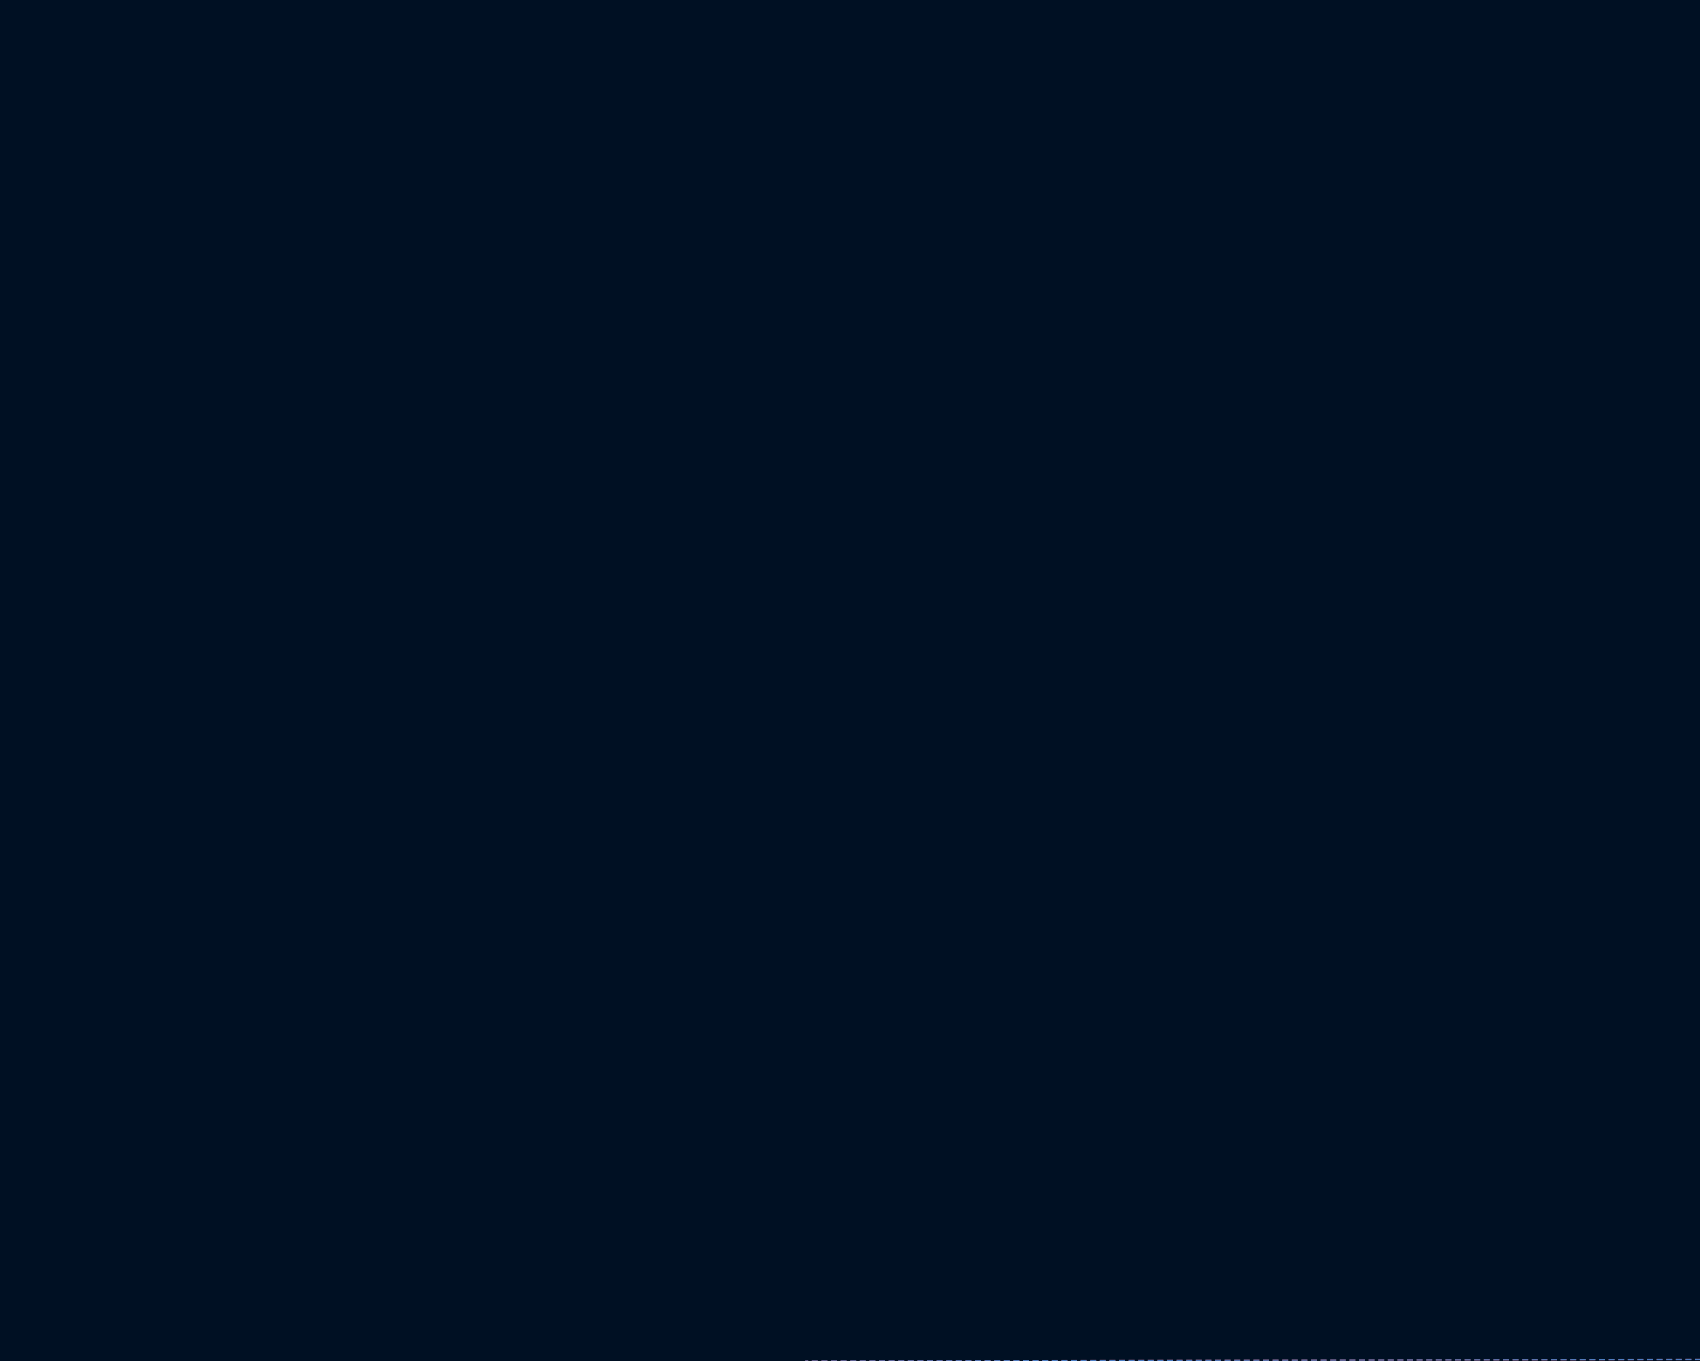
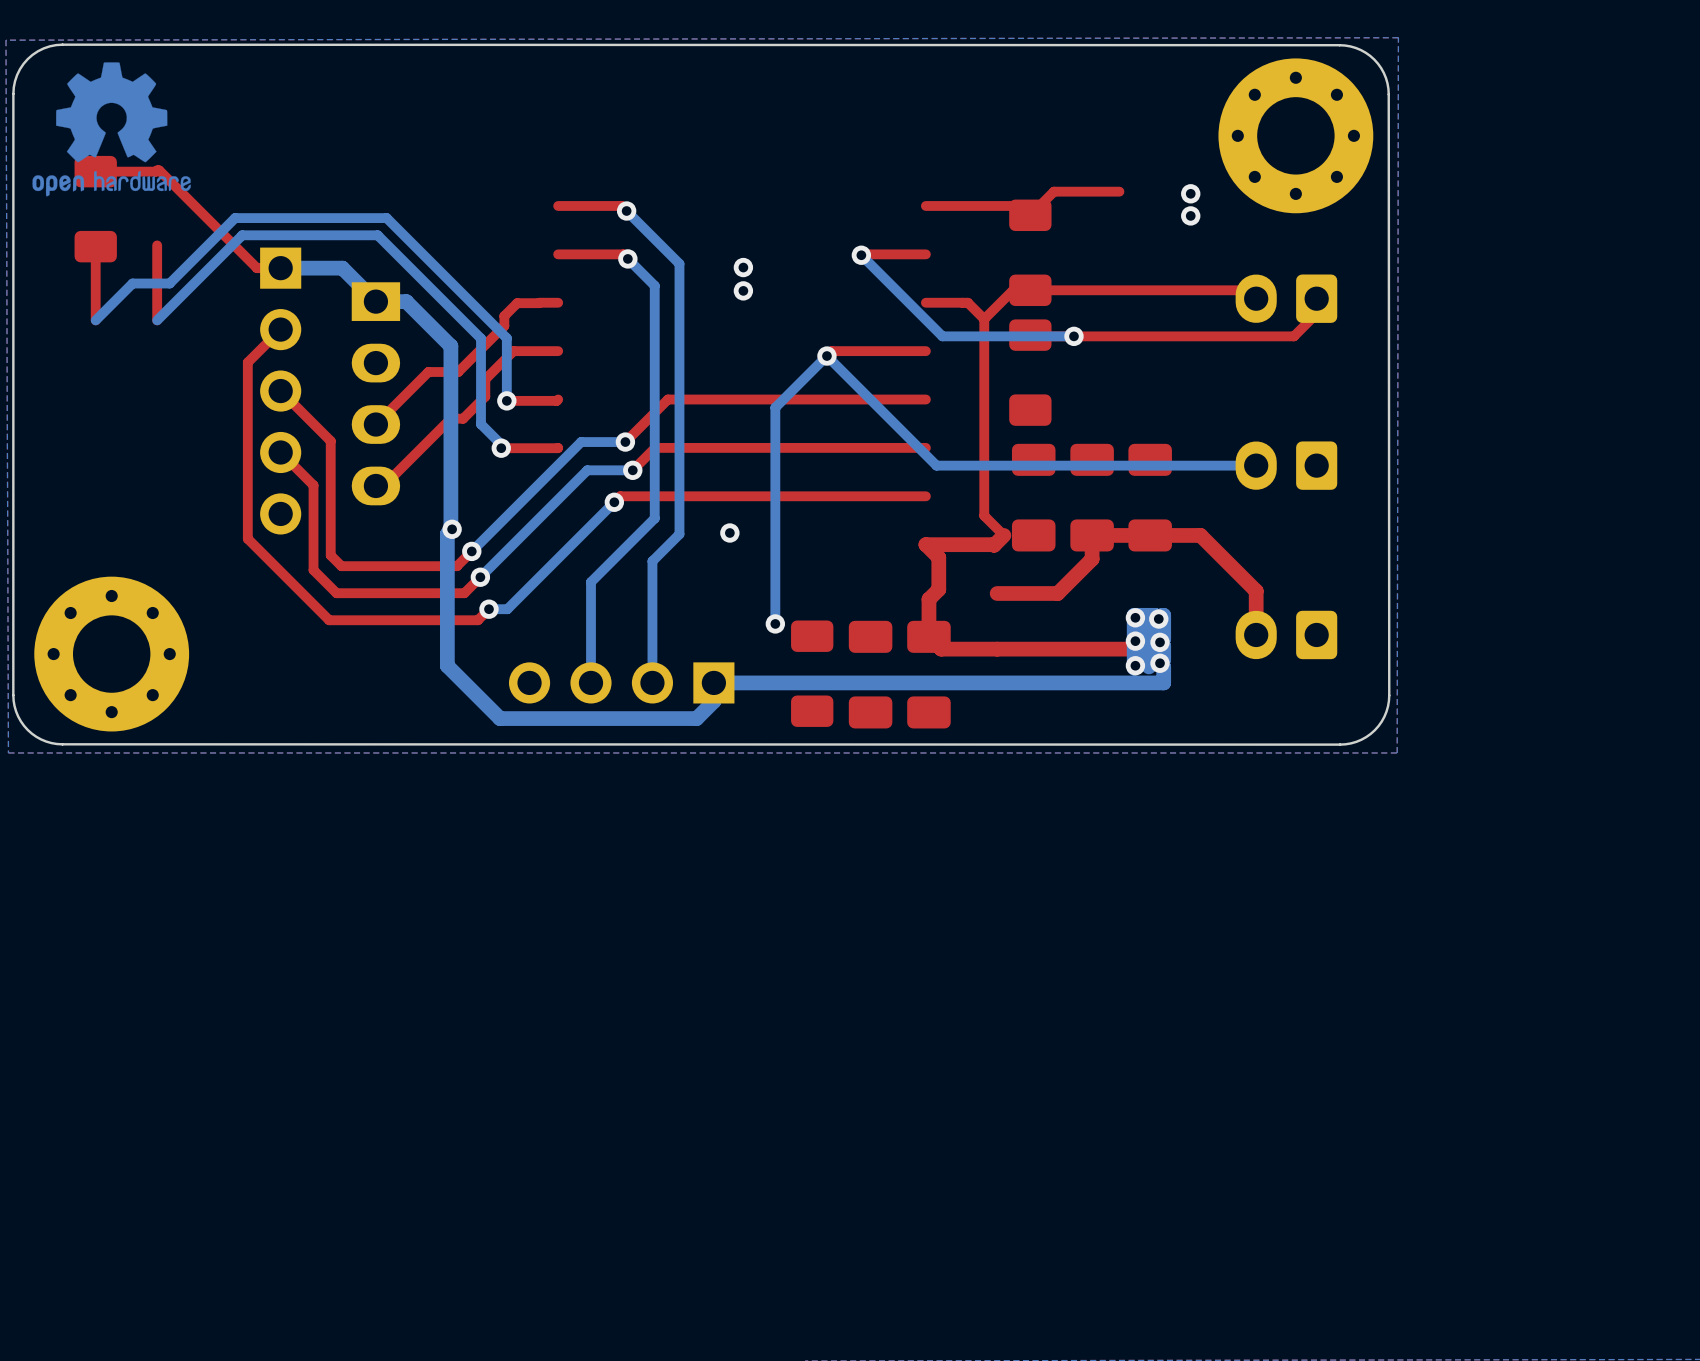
bottom zone outline: none -> (1398, 37) (6, 40) (8, 752) (1397, 752) (1398, 37)
top zone outline: none -> (1398, 37) (6, 40) (8, 752) (1397, 752) (1398, 37)
board edge: none -> (62, 44) (1339, 45) (1360, 50) (1374, 59) (1381, 68) (1387, 83) (1388, 94) (1389, 695) (1384, 716) (1378, 726) (1366, 737) (1356, 741) (1340, 744) (62, 744) (41, 739) (27, 729) (20, 721) (14, 706) (13, 695) (13, 93) (17, 75) (27, 59) (43, 48) (62, 44)
drawing: none -> [32, 62, 191, 197]
part: none -> (1295, 135)
top track: none -> (95, 171) (159, 170) (257, 268) (280, 268)
top track: none -> (1119, 191) (1053, 191) (1030, 215) (1021, 205) (925, 205)
via: none -> (1190, 193)
top track: none -> (558, 205) (621, 205) (626, 211)
part: none -> (95, 209)
bottom track: none -> (626, 211) (679, 263) (679, 534) (652, 561) (652, 682)
via: none -> (626, 211)
via: none -> (1190, 215)
top track: none -> (157, 245) (157, 320)
top track: none -> (95, 246) (95, 320)
part: none -> (1030, 252)
top track: none -> (558, 254) (623, 254) (627, 258)
top track: none -> (925, 254) (861, 255)
bottom track: none -> (861, 255) (942, 336) (1073, 336)
via: none -> (861, 255)
bottom track: none -> (627, 258) (654, 285) (654, 518) (590, 582) (590, 682)
via: none -> (627, 258)
via: none -> (743, 267)
bottom track: none -> (280, 268) (342, 268) (375, 301) (406, 301) (450, 346) (452, 529) (447, 534) (447, 665) (500, 718) (696, 718) (713, 701) (713, 682) (1163, 682) (1163, 666) (1160, 663) (1163, 659) (1163, 646) (1160, 642) (1163, 638) (1163, 615) (1158, 619) (1155, 615) (1134, 615) (1134, 668)
via: none -> (743, 290)
top track: none -> (1256, 298) (1247, 290) (1013, 290) (984, 319)
part: none -> (1286, 298)
top track: none -> (1316, 298) (1316, 313) (1293, 336) (1030, 335)
top track: none -> (558, 302) (517, 303) (504, 316) (504, 325) (458, 372) (428, 372) (375, 424)
top track: none -> (925, 302) (967, 302) (984, 319)
top track: none -> (984, 319) (984, 515) (1003, 535) (994, 545) (925, 544) (938, 557) (938, 589) (928, 599) (928, 636) (941, 649) (1149, 649)
bottom track: none -> (95, 320) (132, 283) (169, 283) (235, 218) (386, 218) (506, 338) (506, 400)
bottom track: none -> (157, 320) (242, 235) (377, 235) (481, 338) (481, 424) (501, 444) (501, 448)
top track: none -> (280, 329) (247, 362) (247, 538) (329, 620) (477, 620) (488, 609)
via: none -> (1073, 336)
top track: none -> (558, 351) (513, 351) (485, 379) (485, 396) (463, 418) (450, 418) (383, 485) (375, 485)
top track: none -> (925, 351) (831, 351) (826, 356)
via: none -> (826, 356)
part: none -> (1030, 372)
top track: none -> (280, 391) (330, 441) (330, 555) (341, 566) (457, 566) (471, 551)
part: none -> (280, 391)
part: none -> (375, 393)
top track: none -> (558, 399) (506, 400)
top track: none -> (925, 399) (667, 399) (625, 442)
via: none -> (506, 400)
bottom track: none -> (625, 442) (581, 442) (471, 551)
via: none -> (625, 442)
top track: none -> (925, 447) (655, 447) (632, 470)
via: none -> (501, 448)
top track: none -> (557, 448) (501, 448)
top track: none -> (280, 452) (313, 485) (313, 570) (336, 593) (464, 593) (480, 577)
bottom track: none -> (1256, 465) (936, 465) (826, 356) (775, 407) (775, 623)
part: none -> (1286, 465)
bottom track: none -> (632, 470) (587, 470) (480, 577)
via: none -> (632, 470)
top track: none -> (925, 496) (620, 496) (614, 502)
part: none -> (1033, 497)
part: none -> (1092, 497)
part: none -> (1150, 497)
bottom track: none -> (614, 502) (507, 609) (488, 609)
via: none -> (614, 502)
via: none -> (452, 529)
via: none -> (729, 532)
via: none -> (471, 551)
via: none -> (480, 577)
top track: none -> (997, 593) (1057, 593) (1092, 559) (1092, 535) (1200, 535) (1256, 591) (1256, 634)
via: none -> (488, 609)
bottom track: none -> (1148, 615) (1148, 666)
via: none -> (1135, 617)
via: none -> (1158, 619)
via: none -> (775, 623)
part: none -> (1286, 634)
via: none -> (1135, 641)
via: none -> (1160, 642)
part: none -> (111, 654)
via: none -> (1160, 663)
via: none -> (1135, 665)
part: none -> (812, 673)
part: none -> (870, 674)
part: none -> (928, 674)
part: none -> (621, 682)

